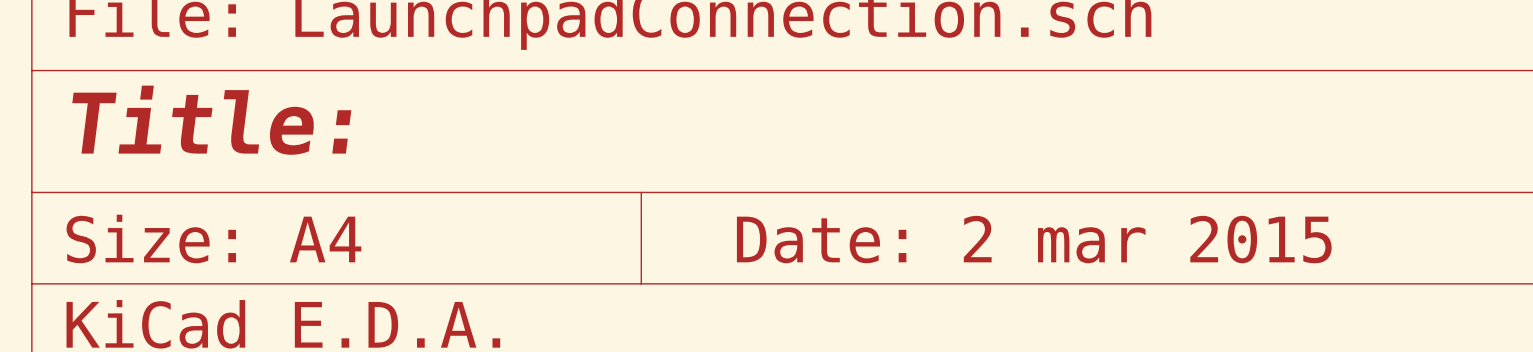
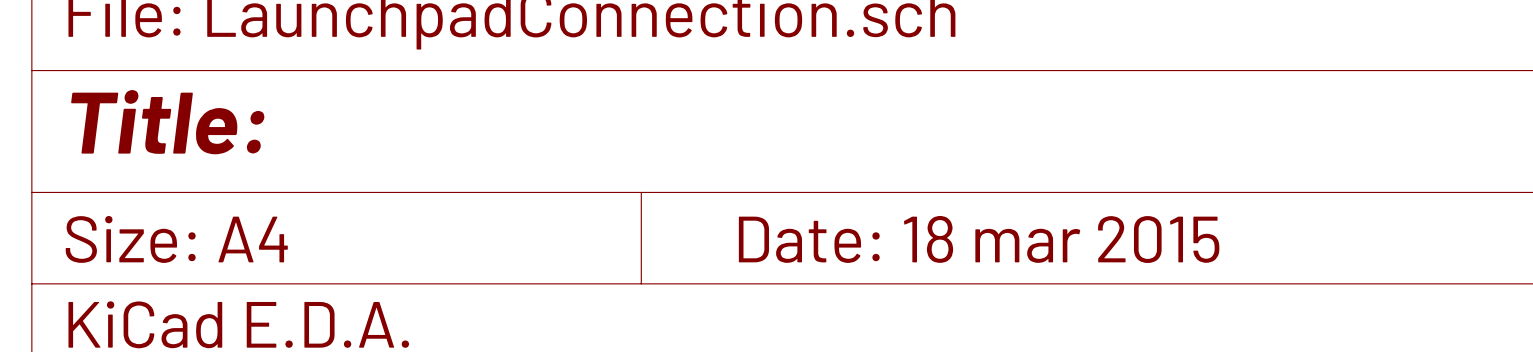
title block: Date: 2 mar 2015 (1034, 239) -> Date: 18 mar 2015 (979, 239)

